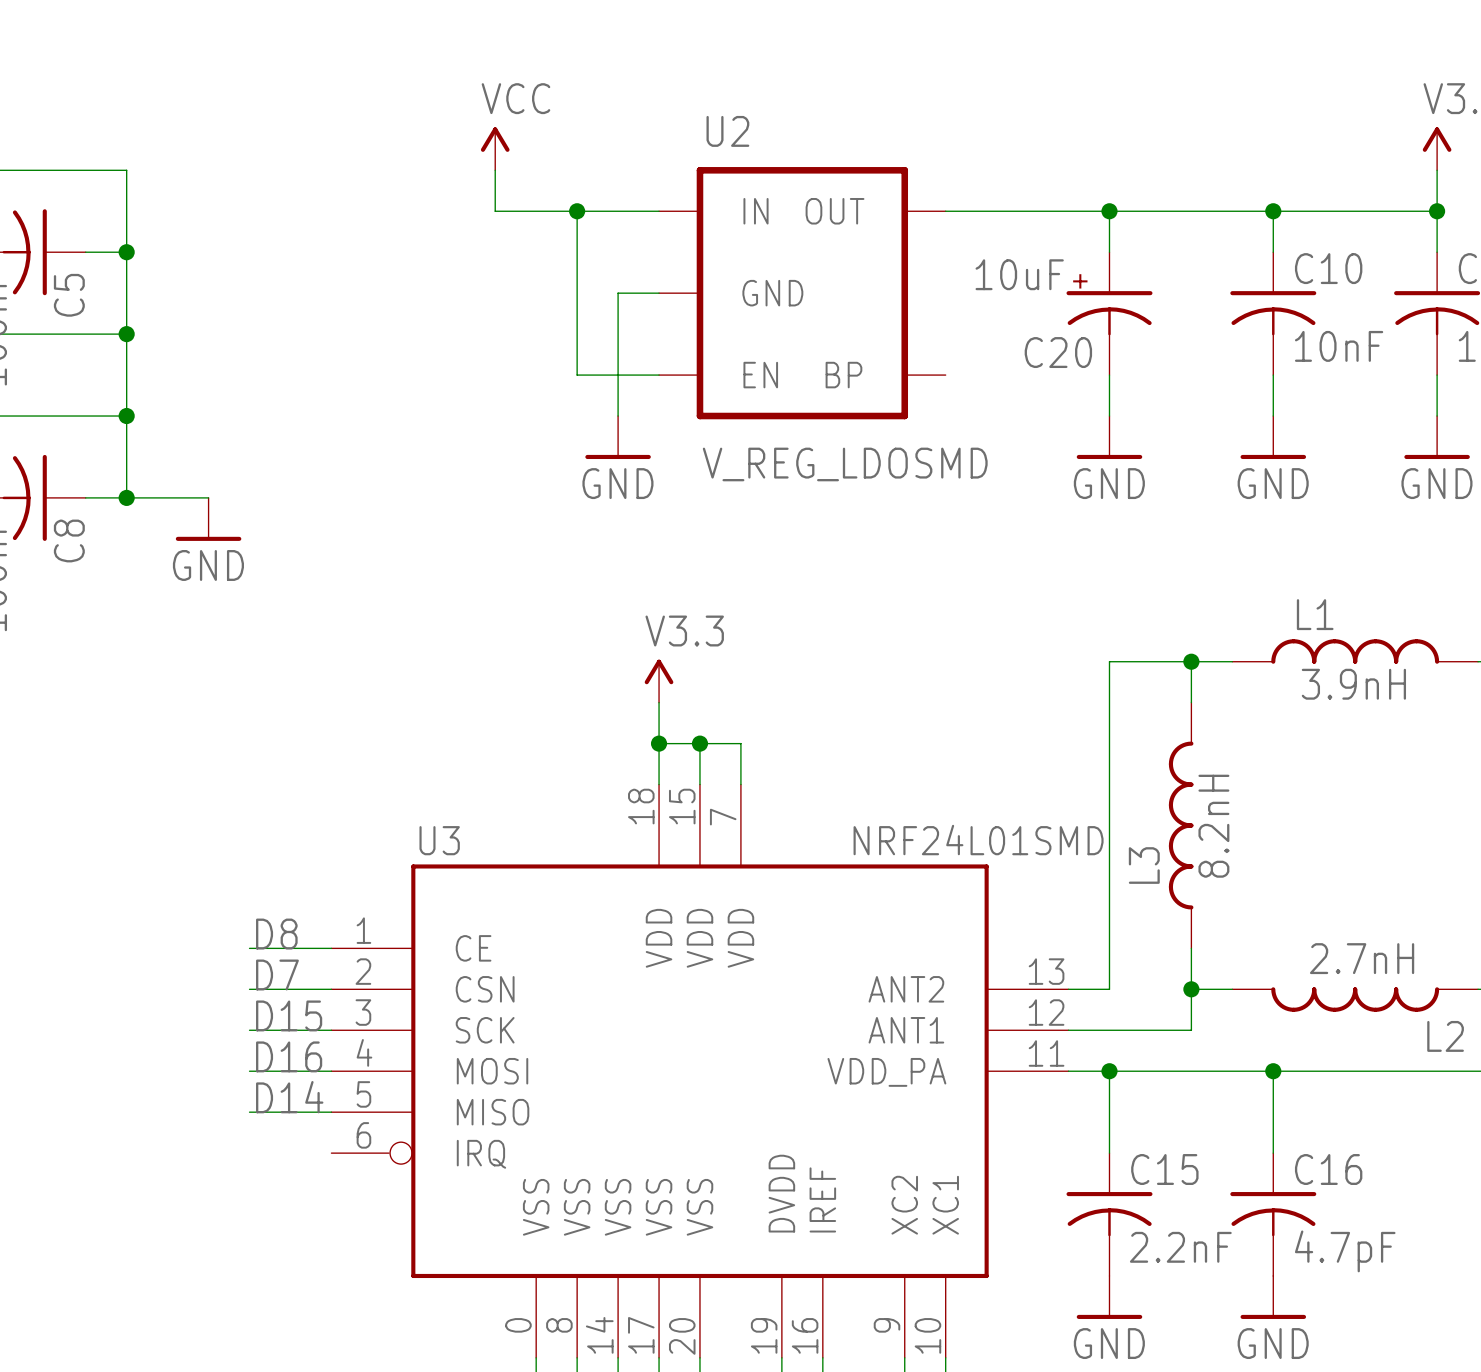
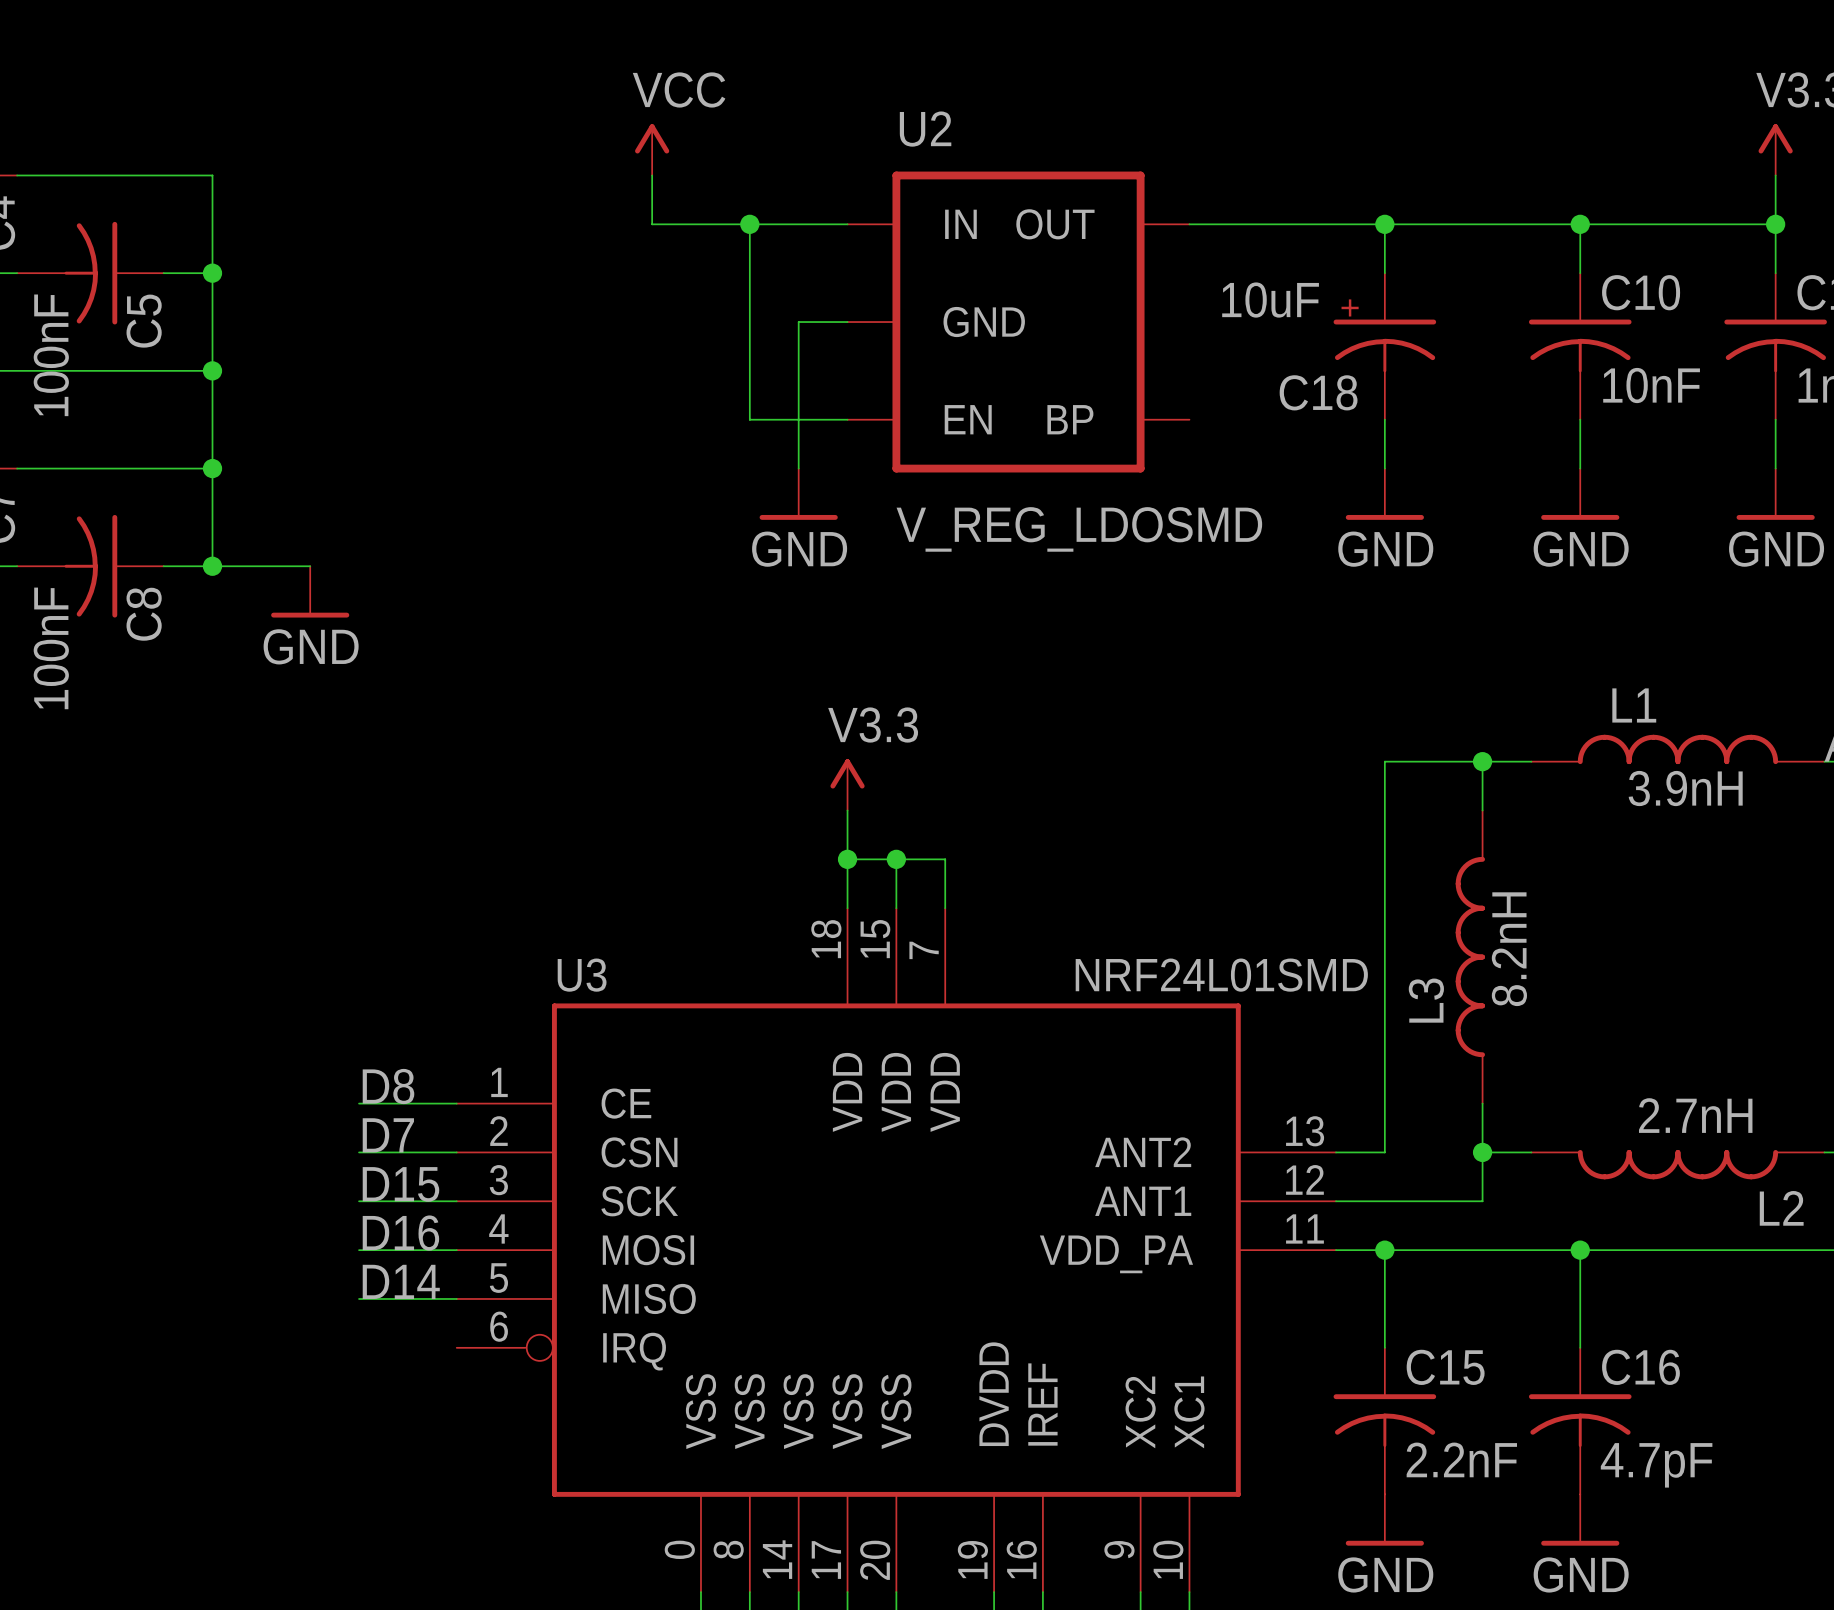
C20 name: C20 (1058, 352) -> C18 (1318, 392)

